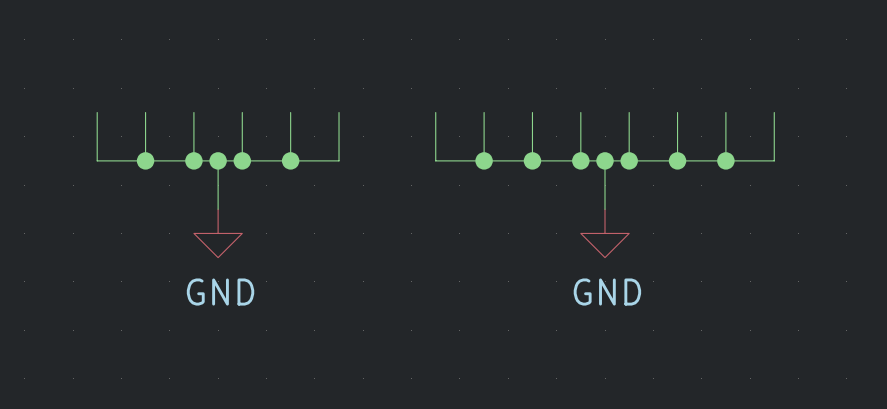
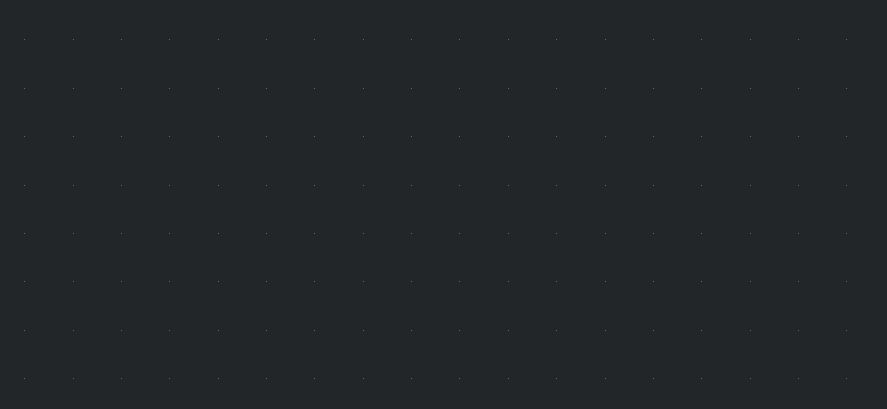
wire: (97, 112) (97, 160) (339, 160) (339, 112) -> none
wire: (145, 112) (145, 160) -> none
wire: (193, 112) (193, 160) -> none
wire: (242, 112) (242, 160) -> none
wire: (290, 112) (290, 160) -> none
wire: (435, 112) (435, 160) (774, 160) (774, 112) -> none
wire: (484, 112) (484, 160) -> none
wire: (532, 112) (532, 160) -> none
wire: (580, 112) (580, 160) -> none
wire: (629, 112) (629, 160) -> none
wire: (677, 112) (677, 160) -> none
wire: (725, 112) (725, 160) -> none
junction: (145, 160) -> none
junction: (193, 160) -> none
wire: (218, 160) (218, 209) -> none
junction: (218, 160) -> none
junction: (242, 160) -> none
junction: (290, 160) -> none
junction: (484, 160) -> none
junction: (532, 160) -> none
junction: (580, 160) -> none
wire: (605, 160) (605, 209) -> none
junction: (605, 160) -> none
junction: (629, 160) -> none
junction: (677, 160) -> none
junction: (725, 160) -> none
power symbol: GND (218, 233) -> none
power symbol: GND (605, 233) -> none

